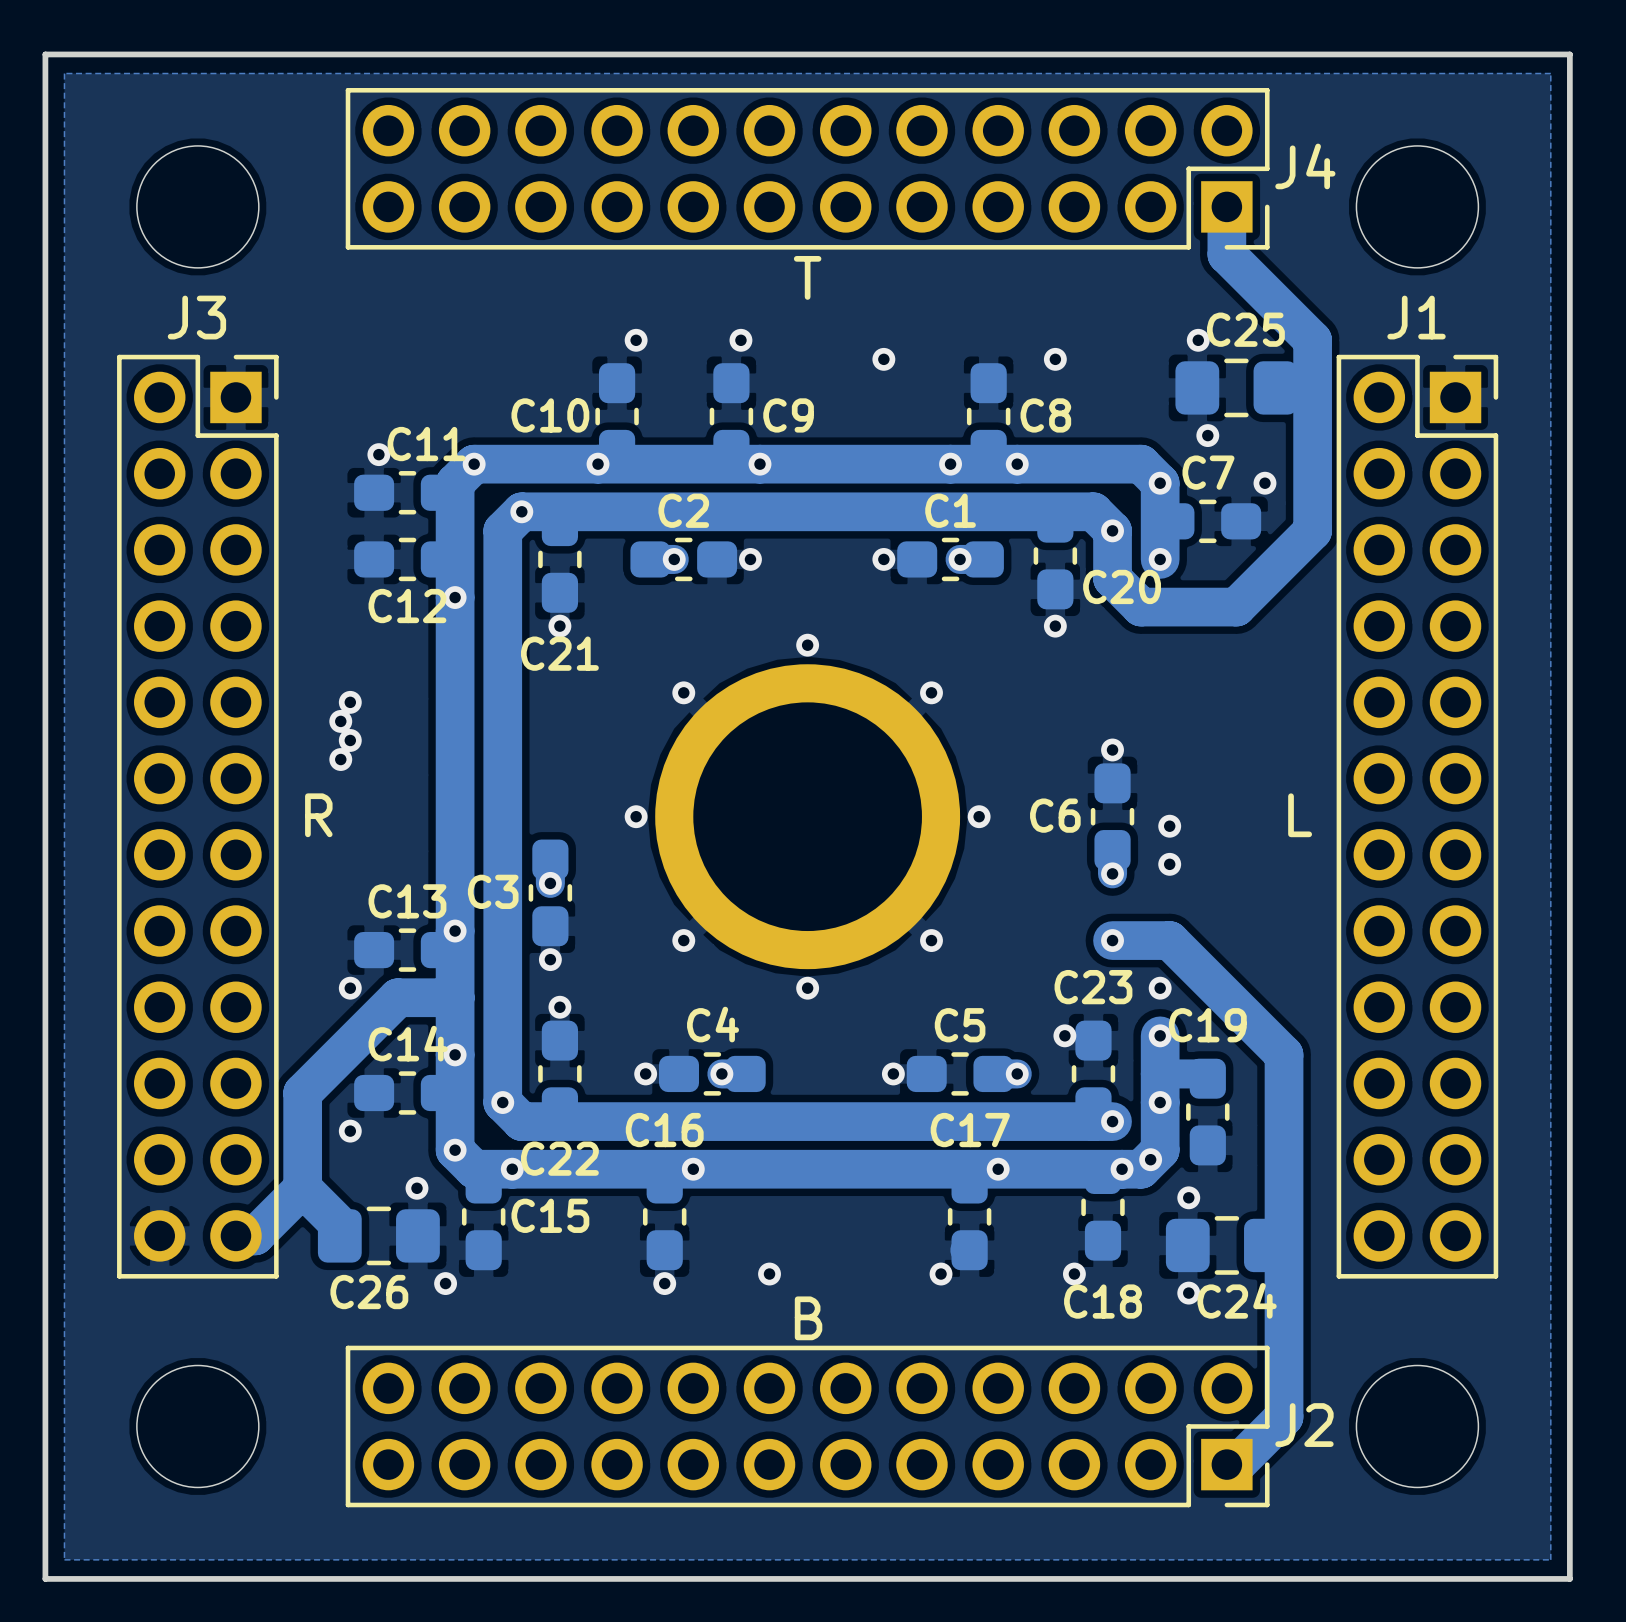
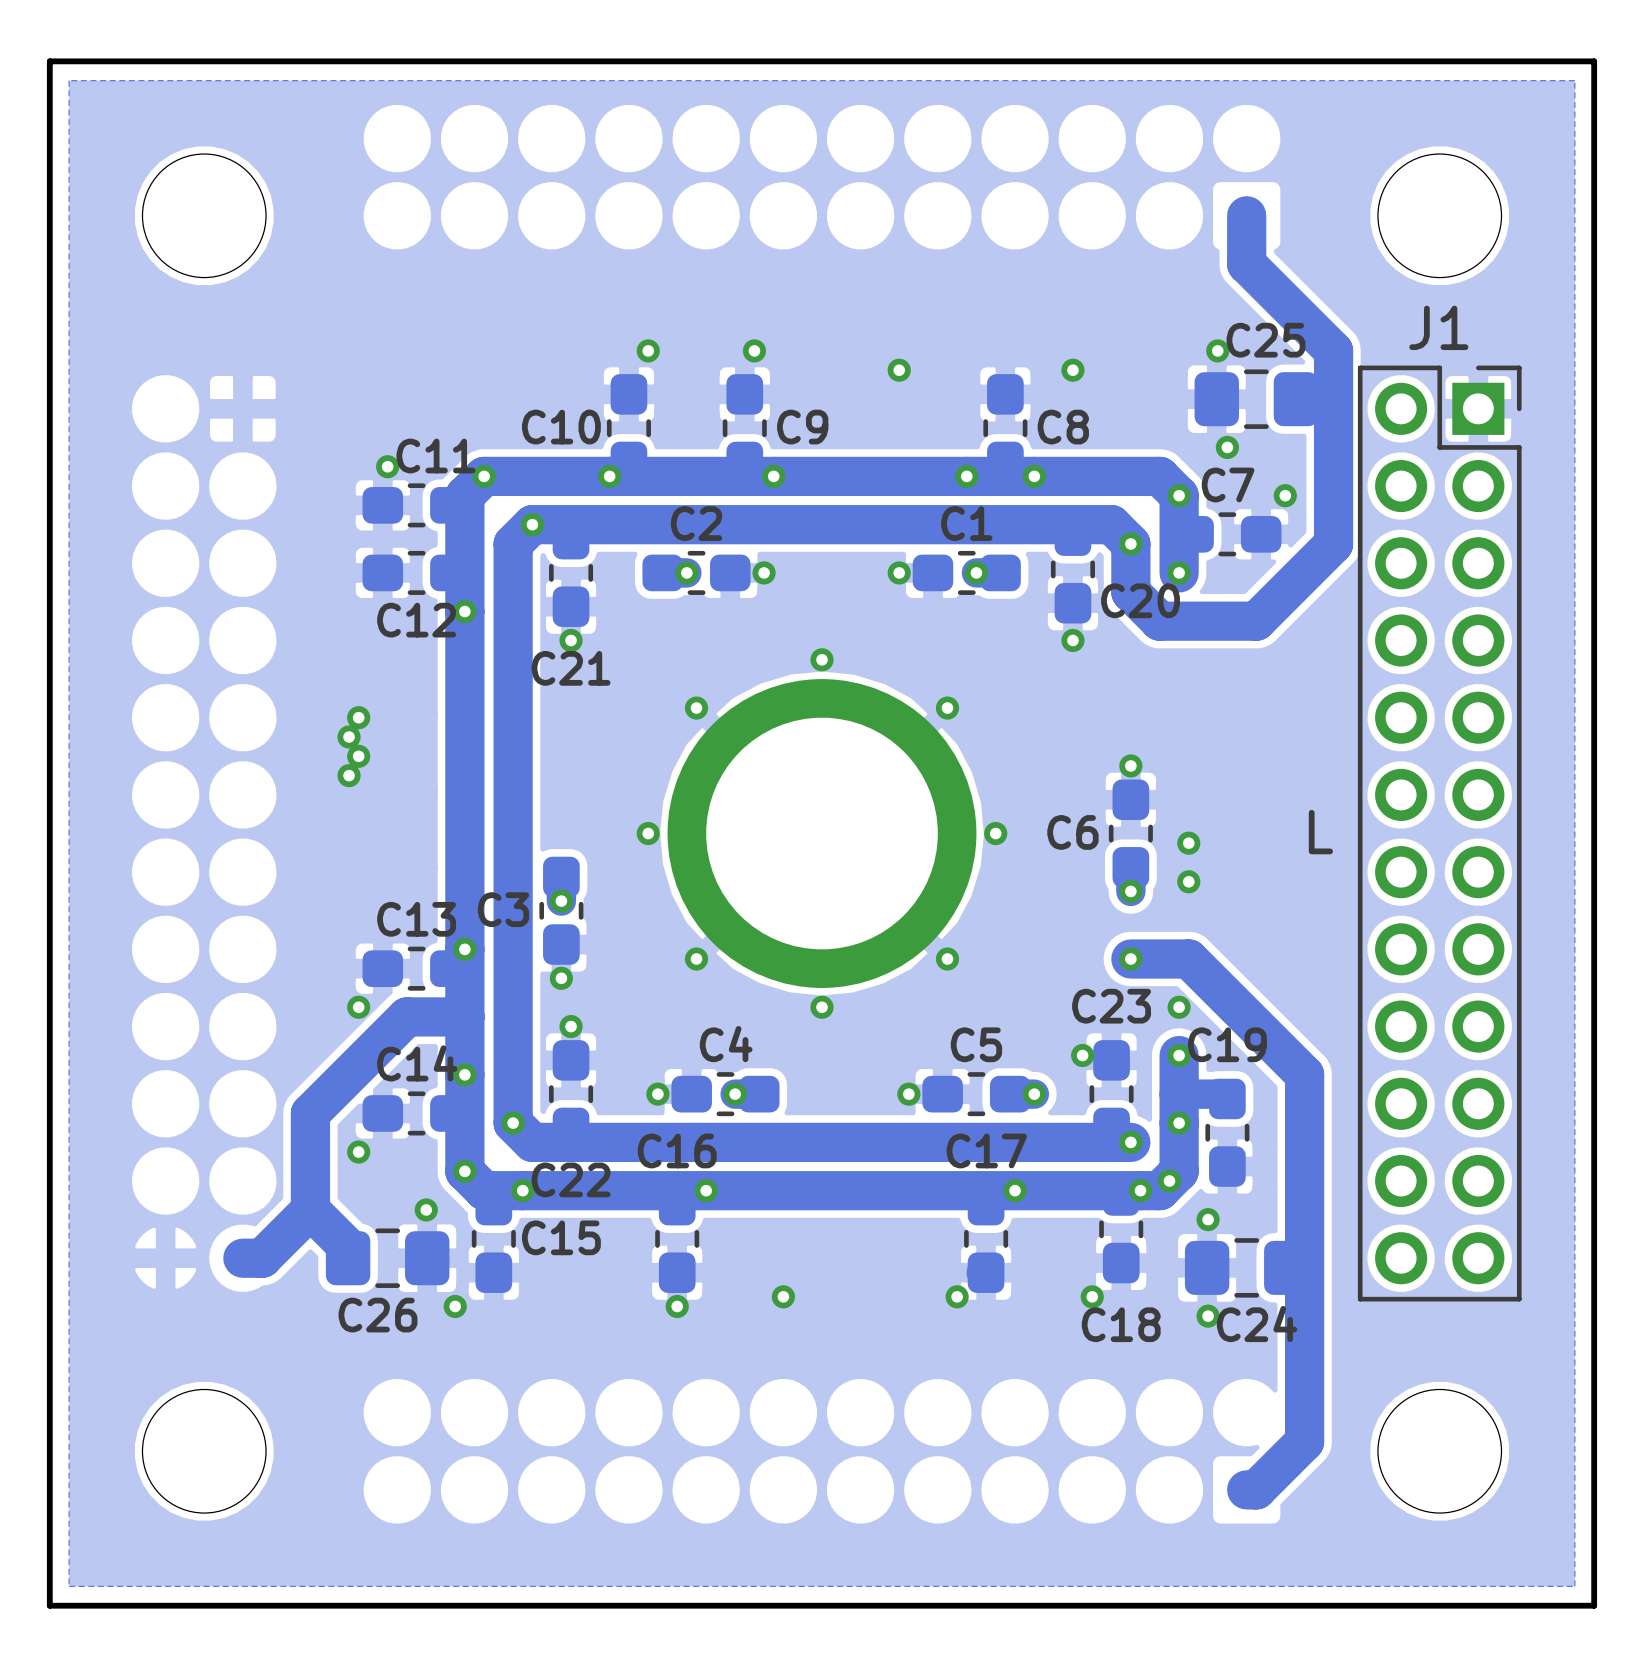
J4: T (807, 168) -> none
J3: R (197, 816) -> none
J2: B (807, 1426) -> none

